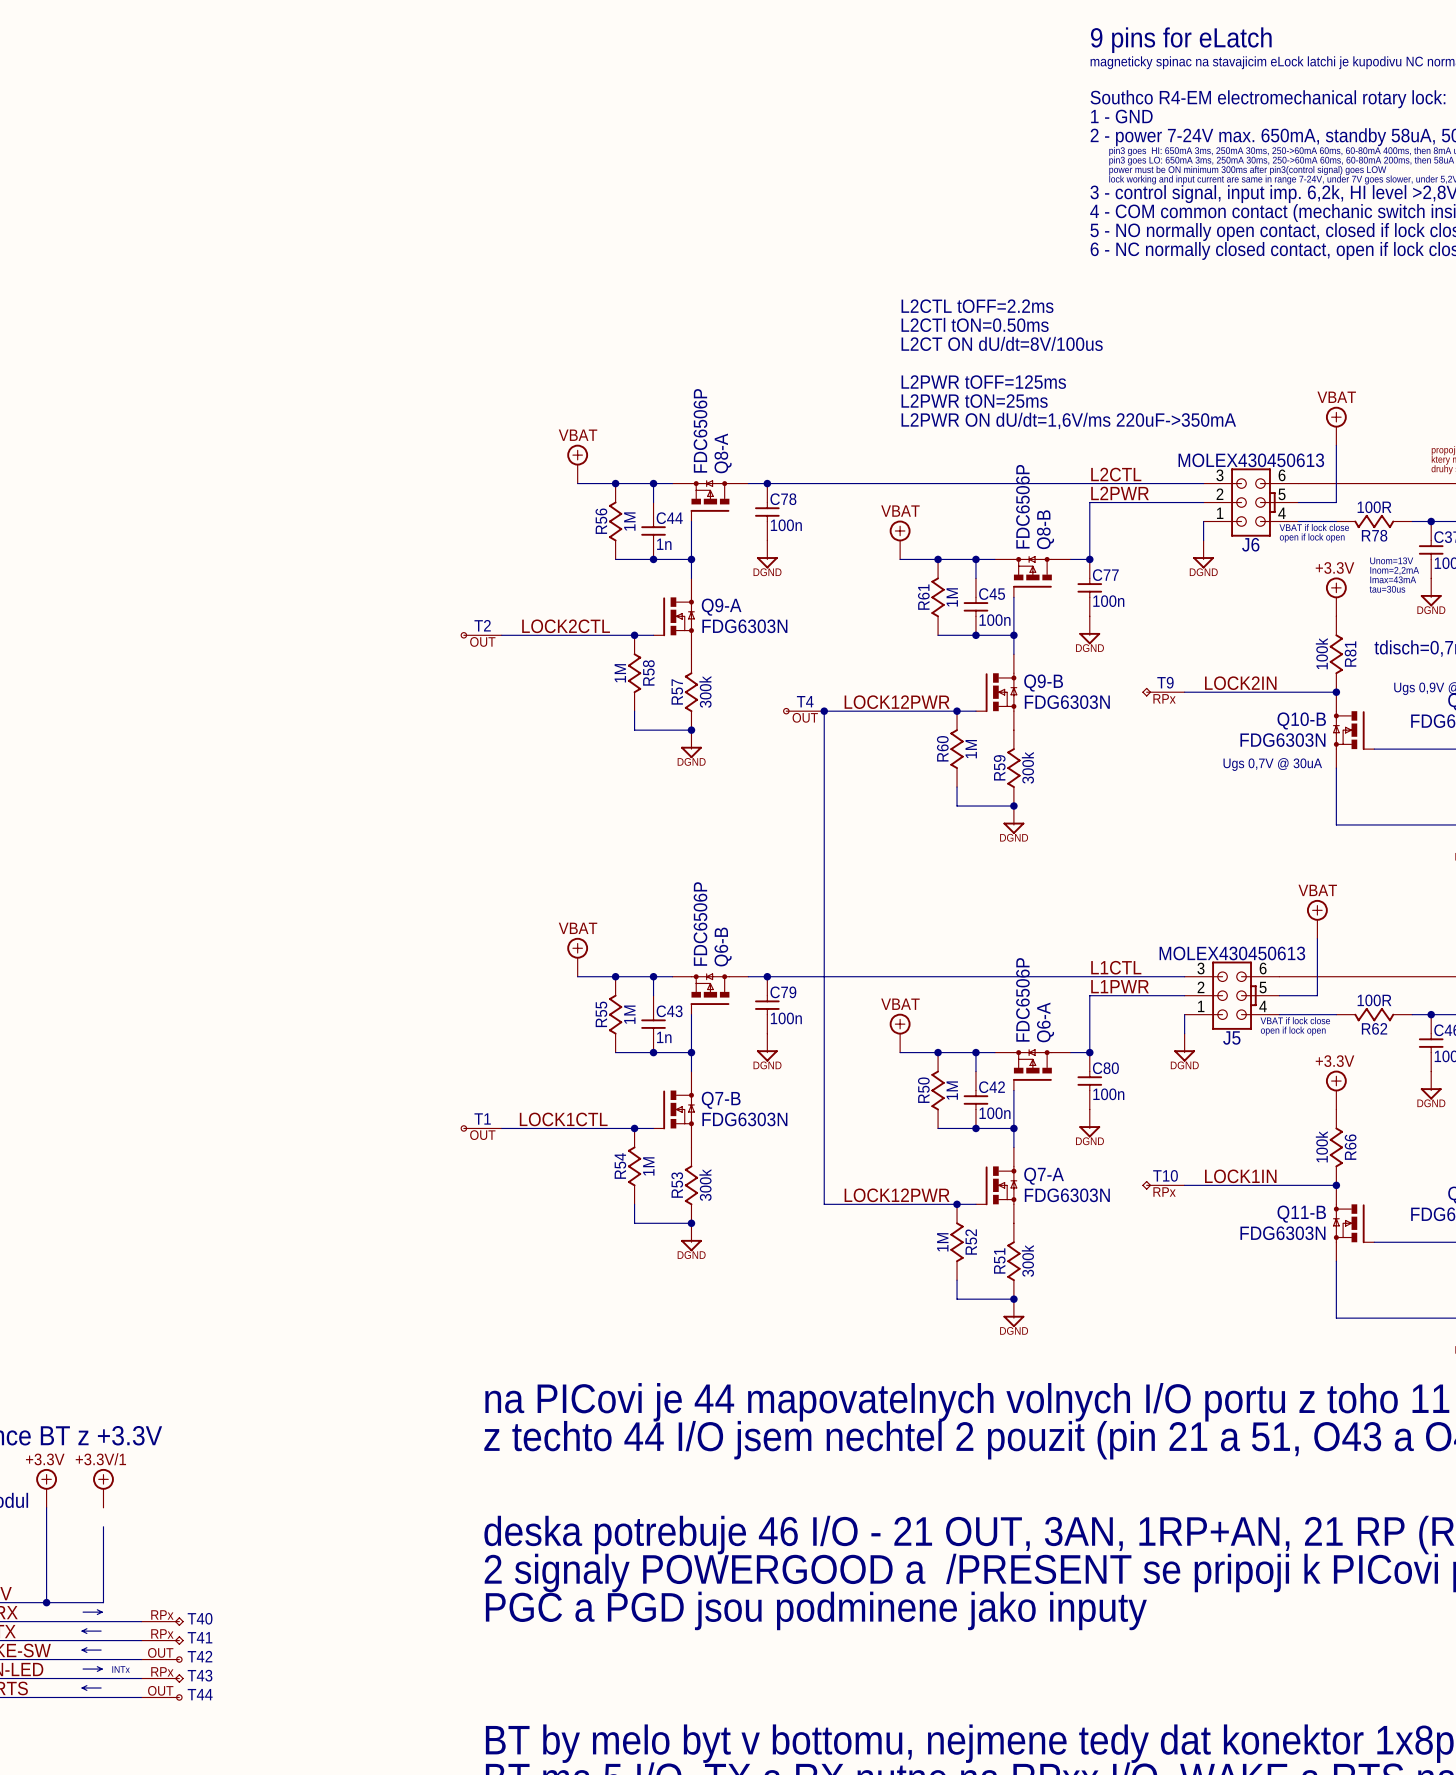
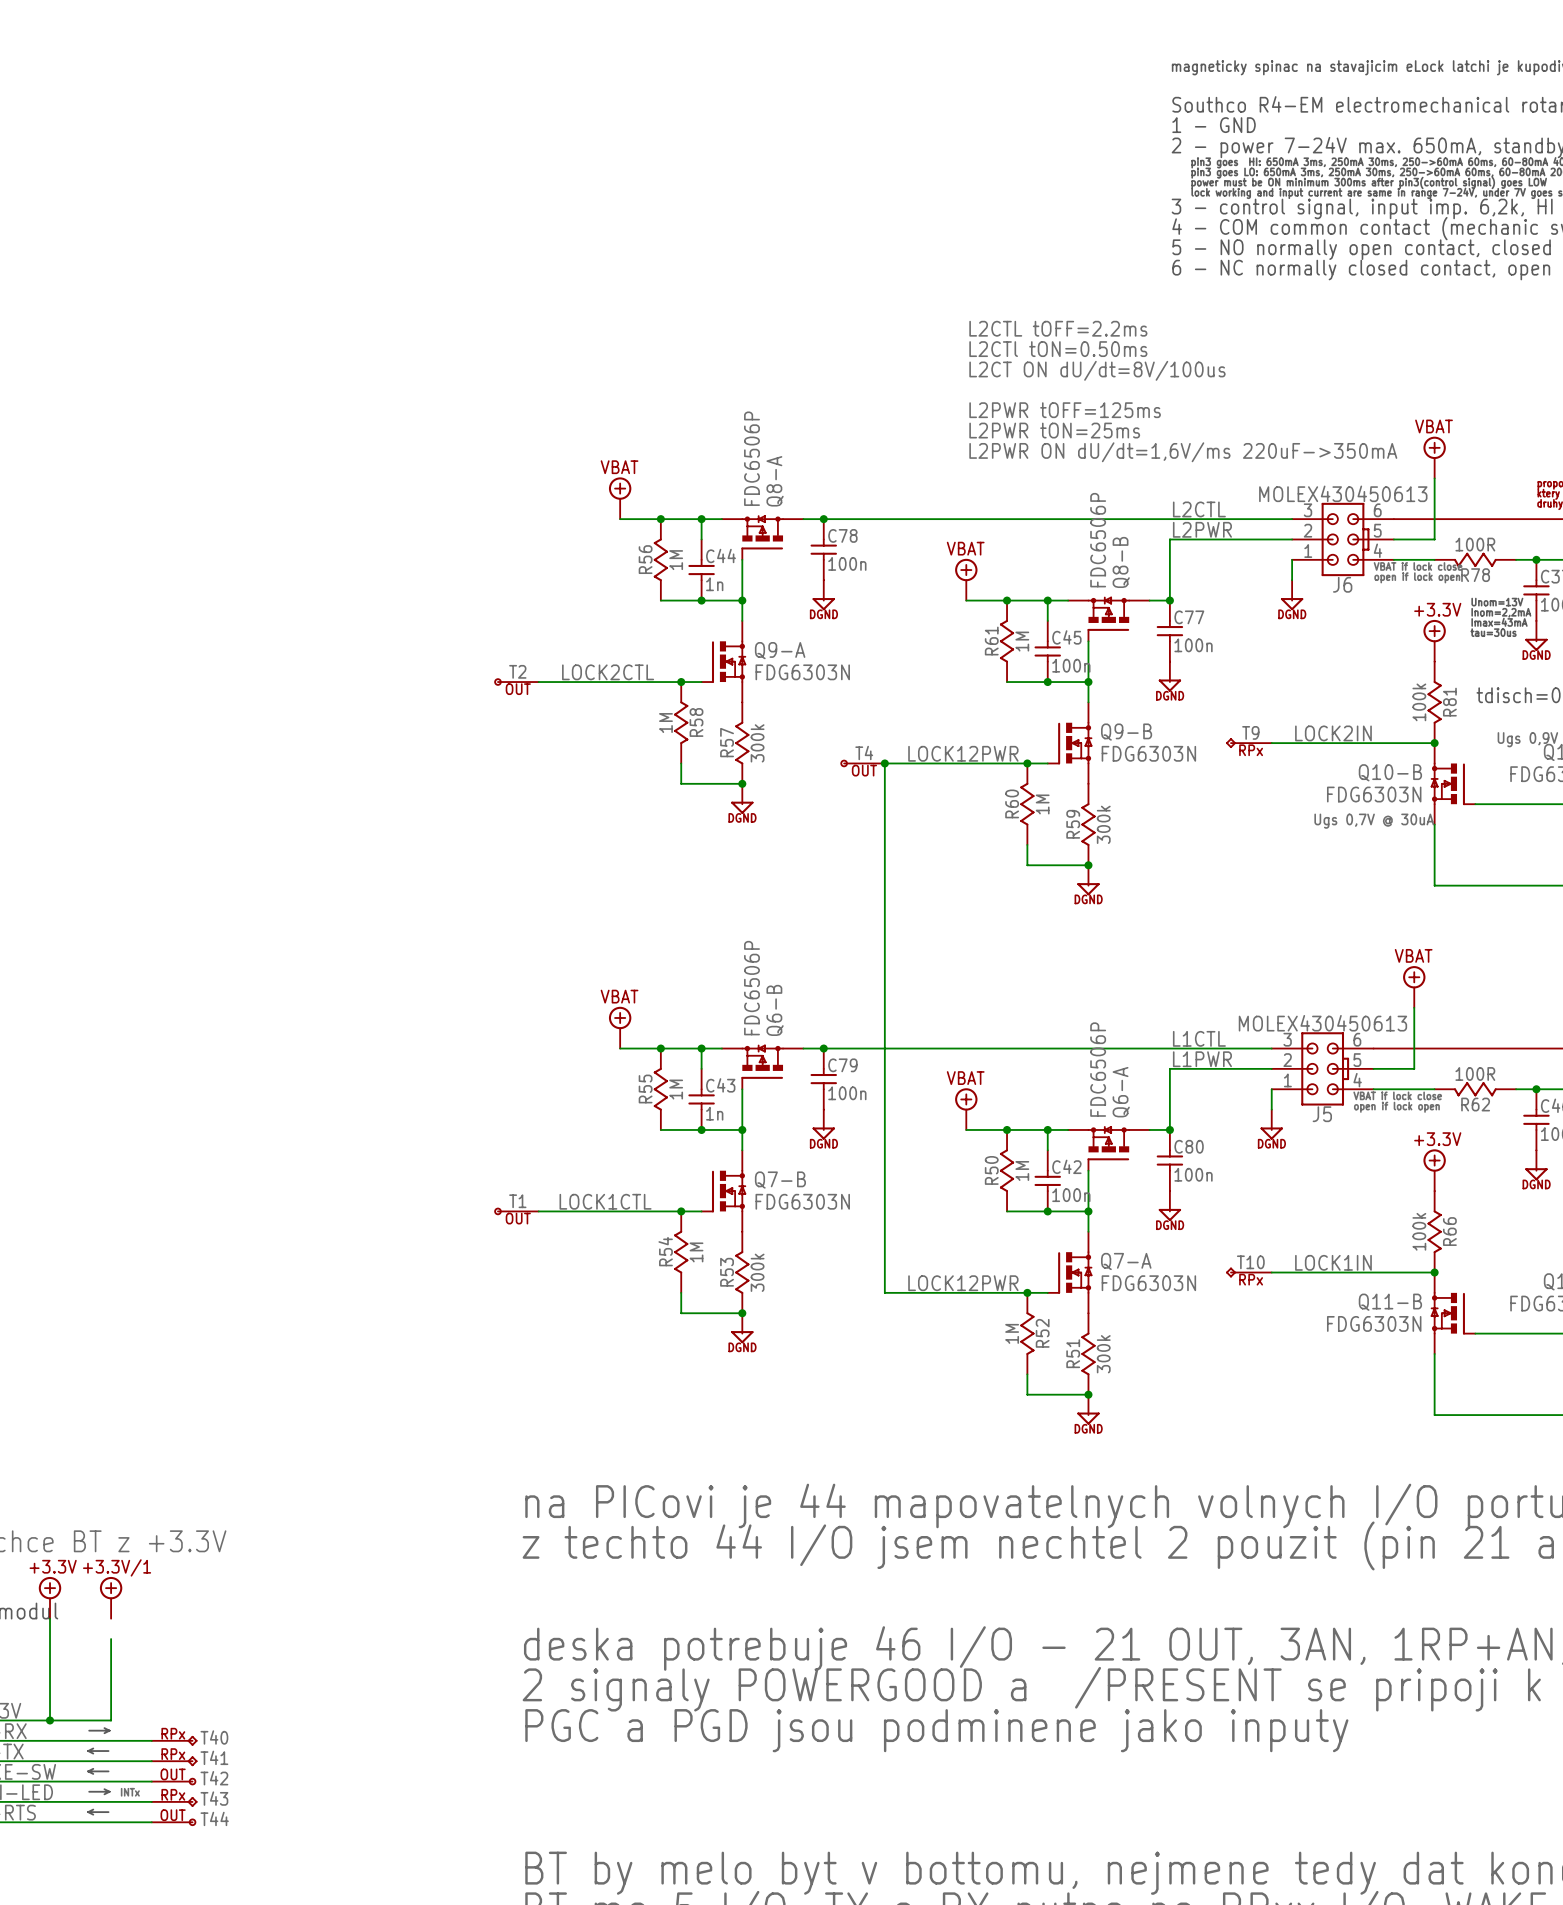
text: 9 pins for eLatch (1181, 40) -> none

